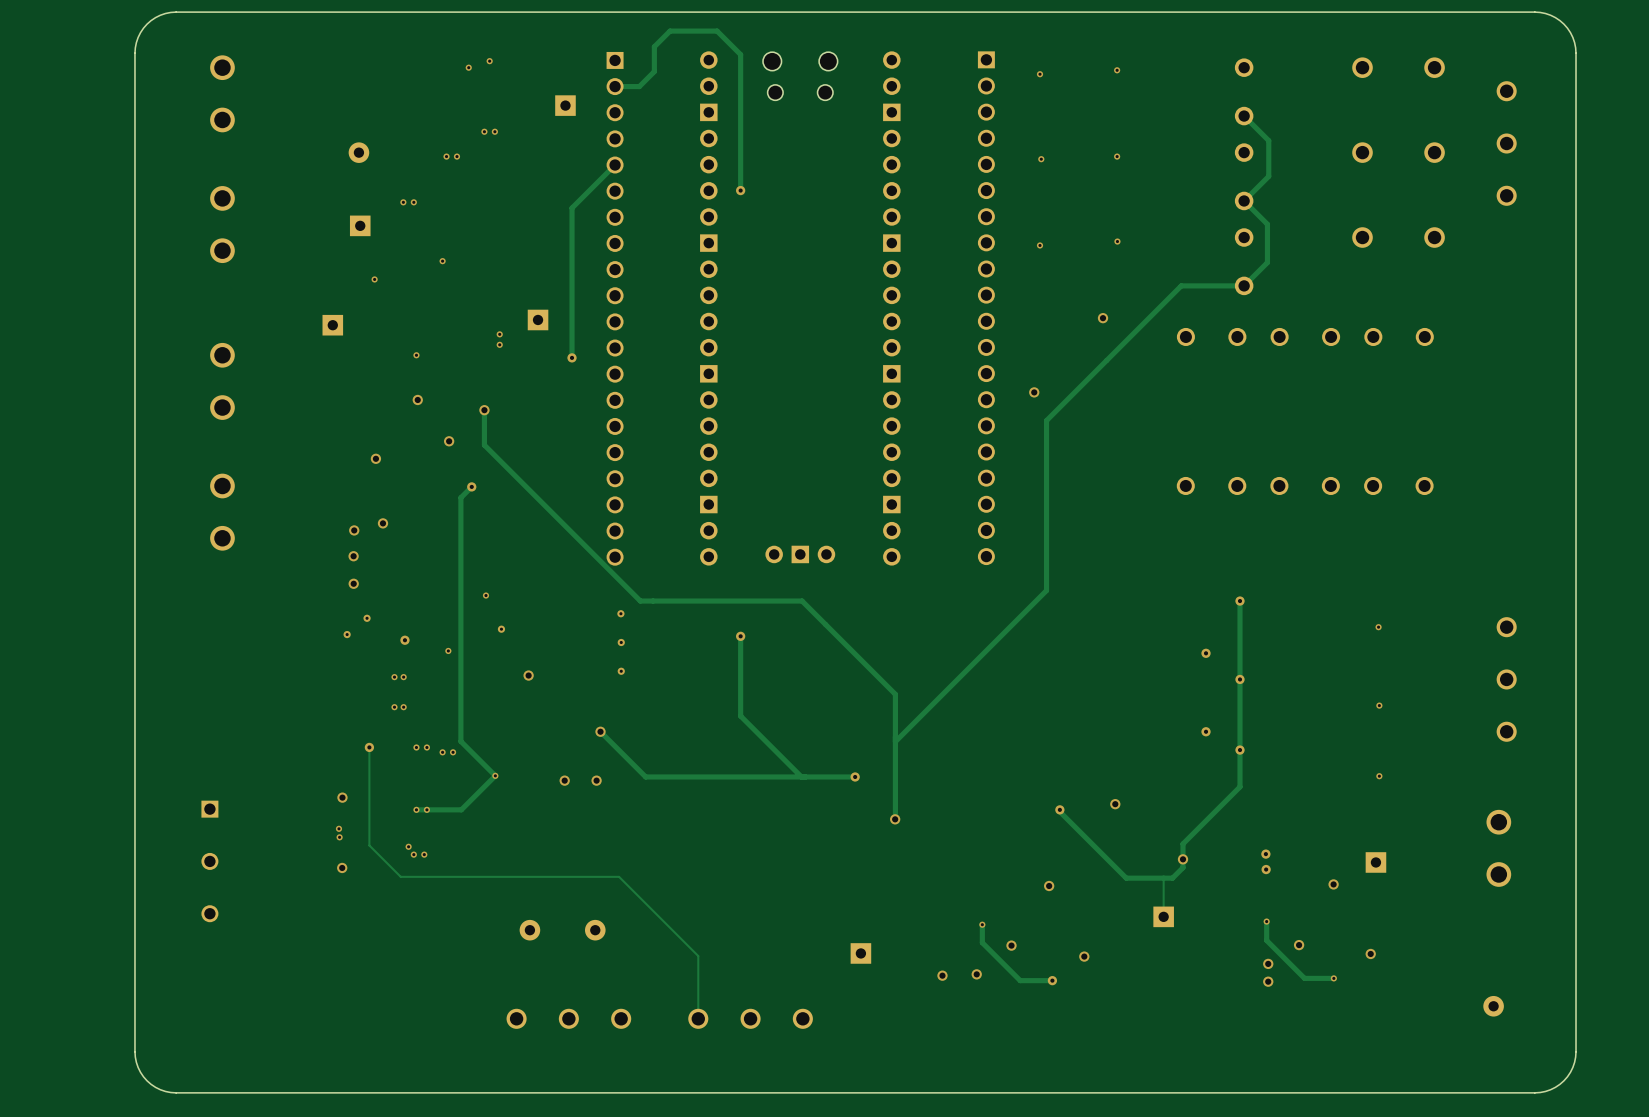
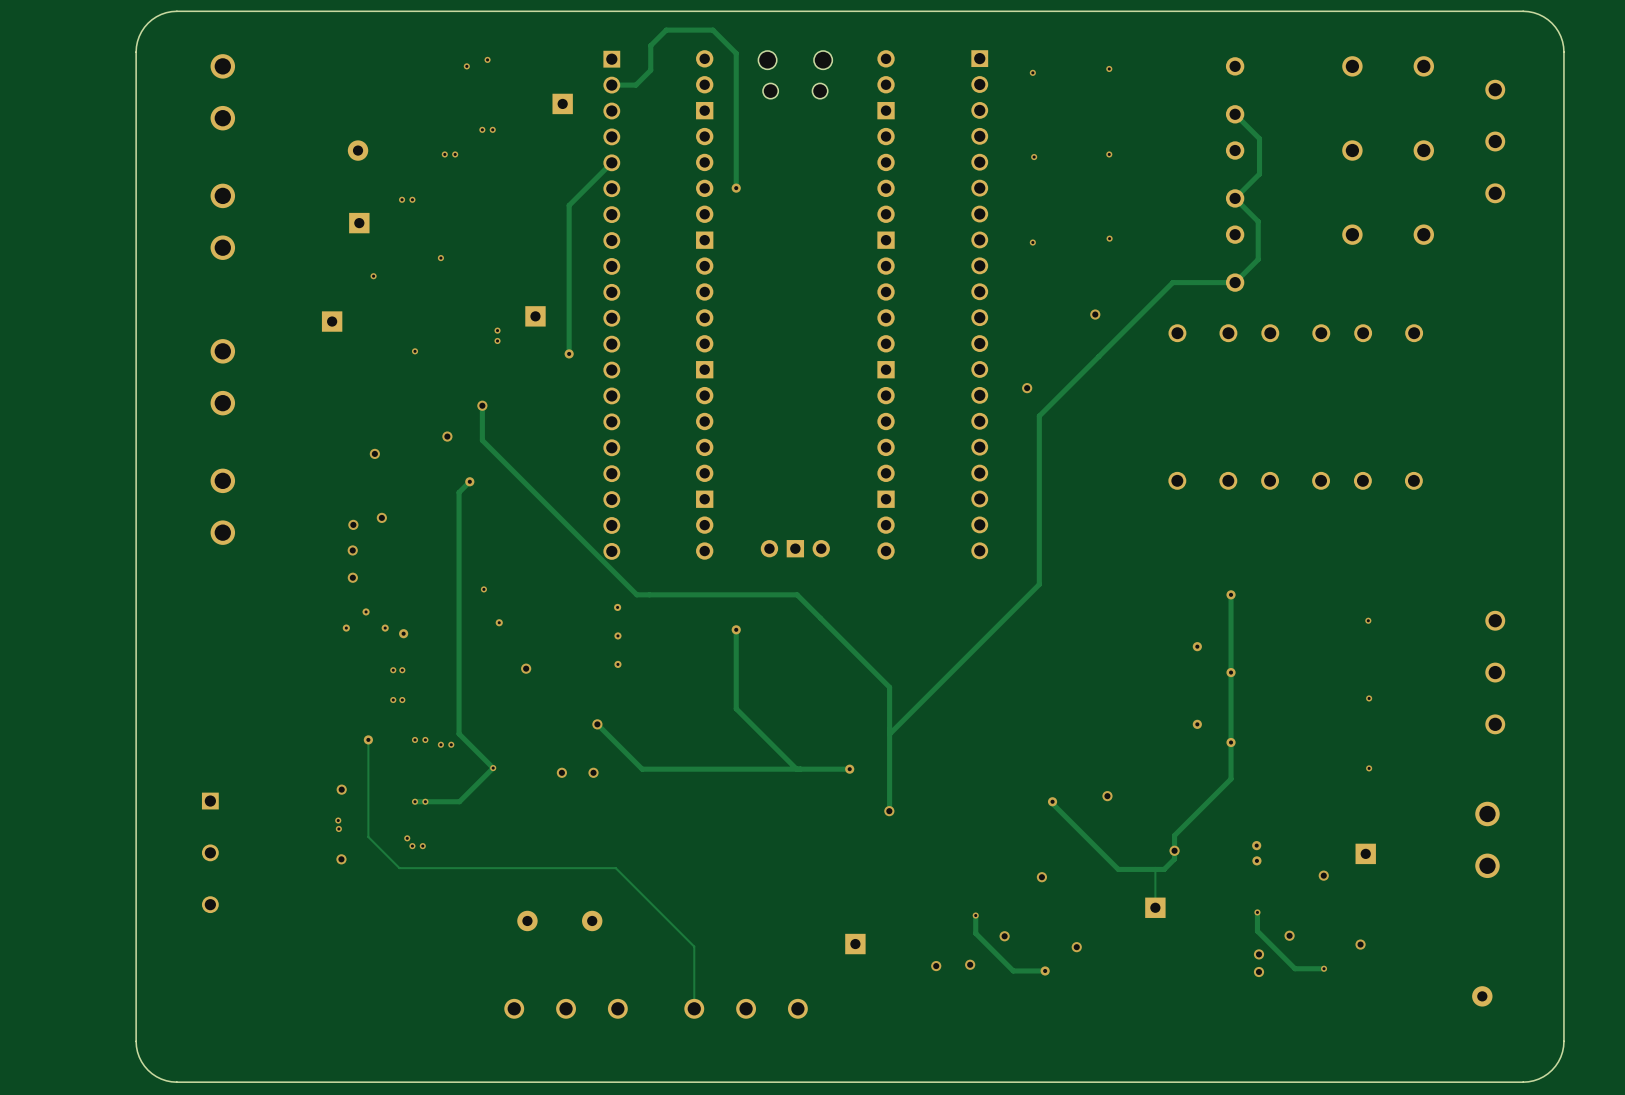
via: (417, 399) -> none
via: none -> (385, 628)
via: (448, 650) -> none

